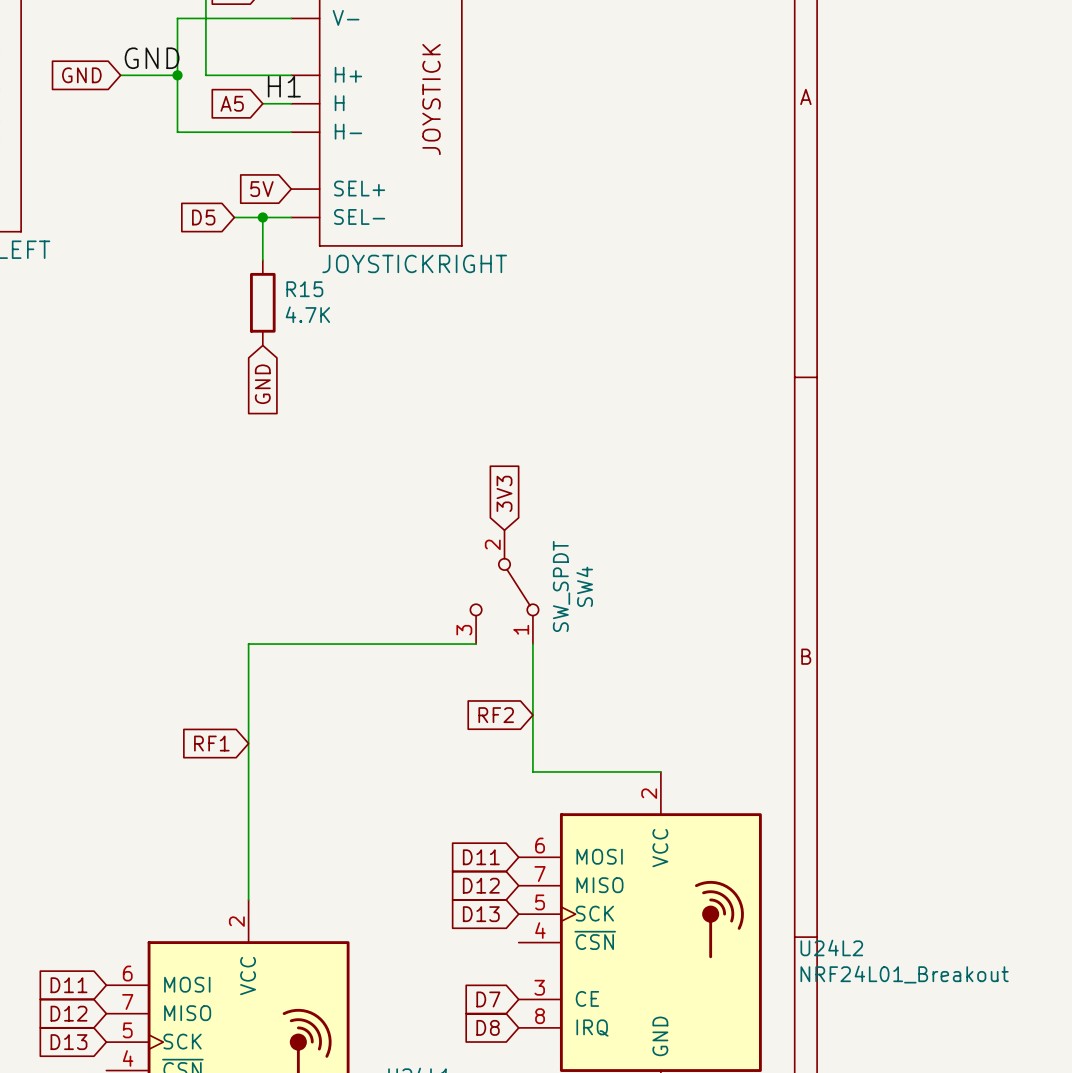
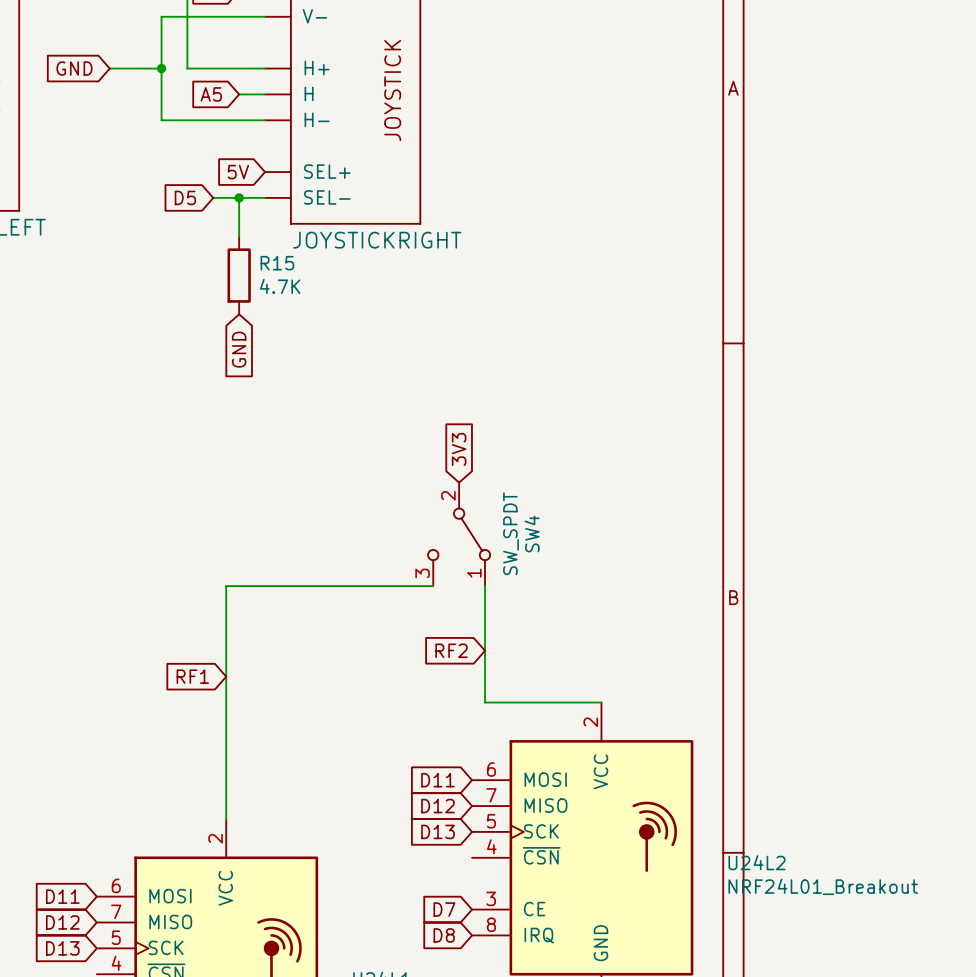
label: GND (152, 58) -> none
label: H1 (284, 86) -> none

